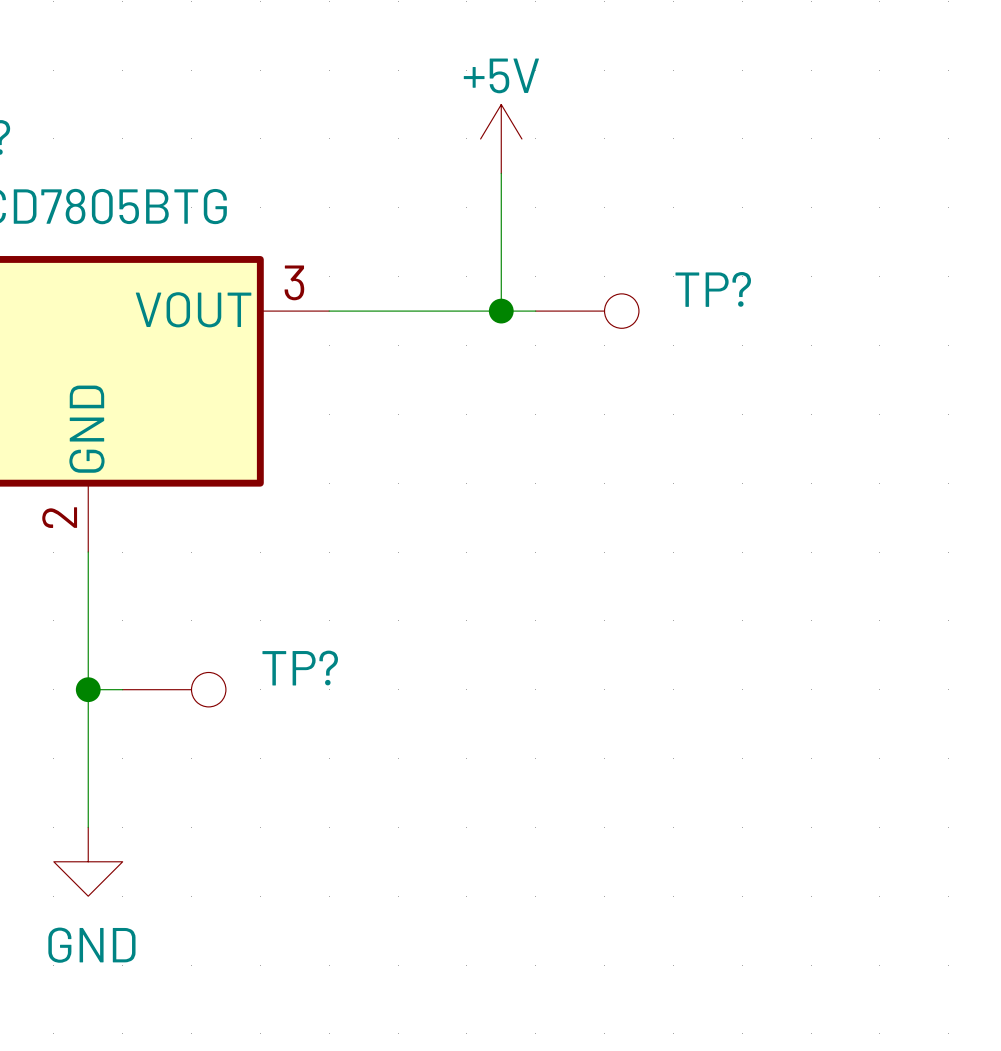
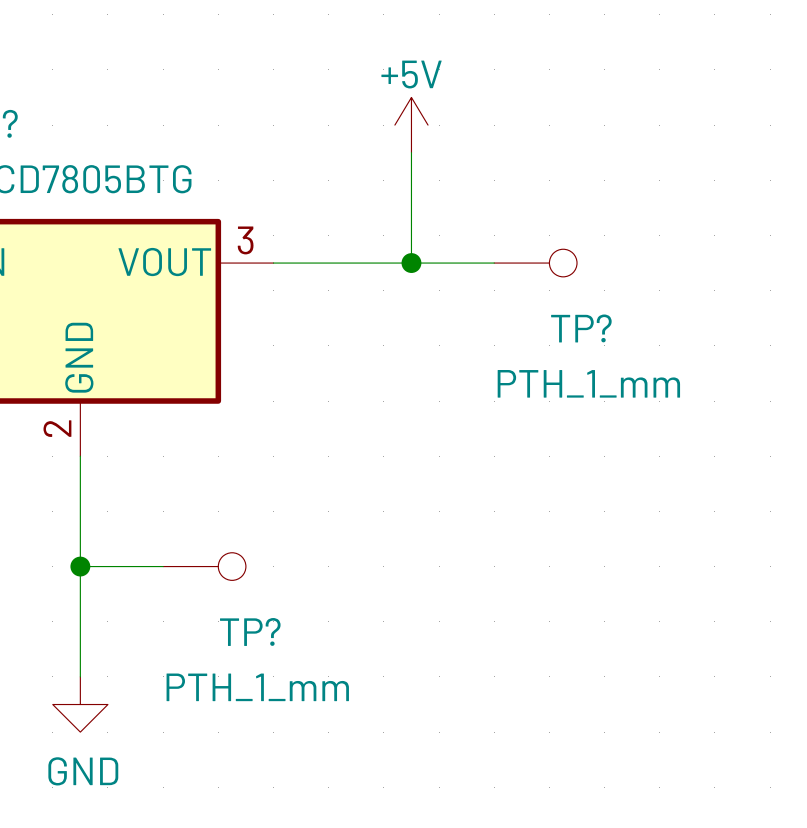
TP?: (587, 311) -> none
TP?: none -> PTH_1_mm (535, 263)
TP?: (174, 689) -> none
TP?: none -> PTH_1_mm (204, 566)

